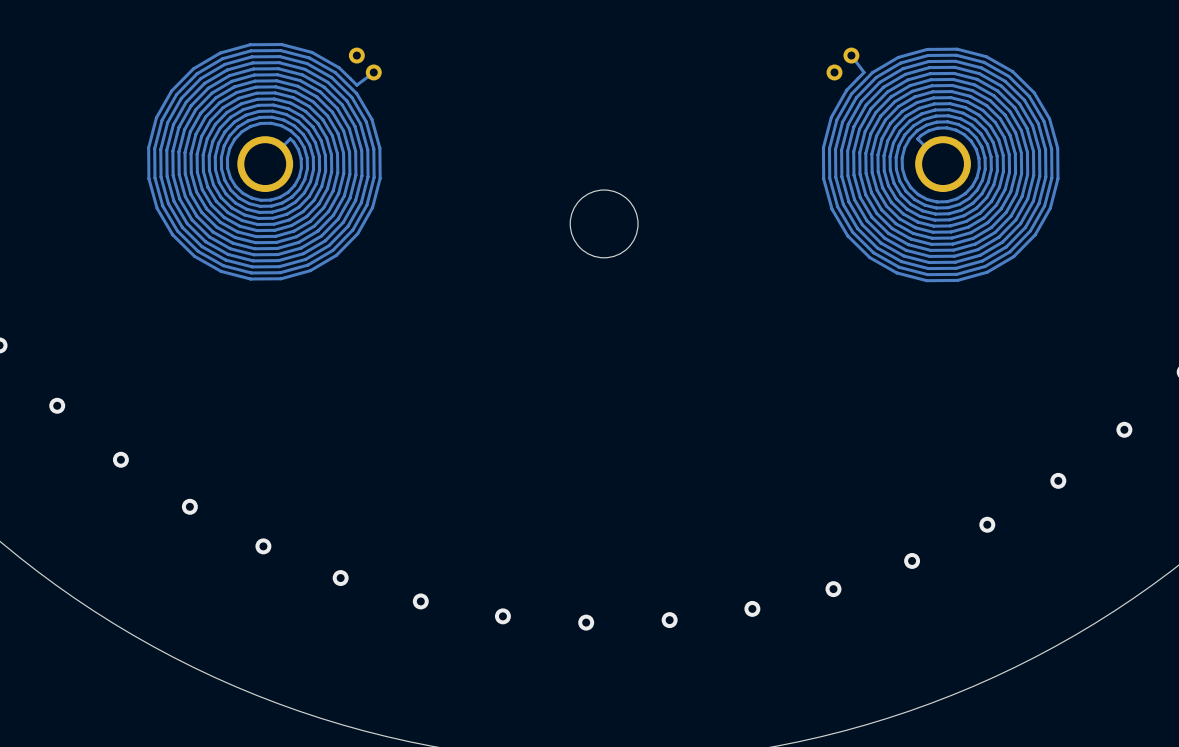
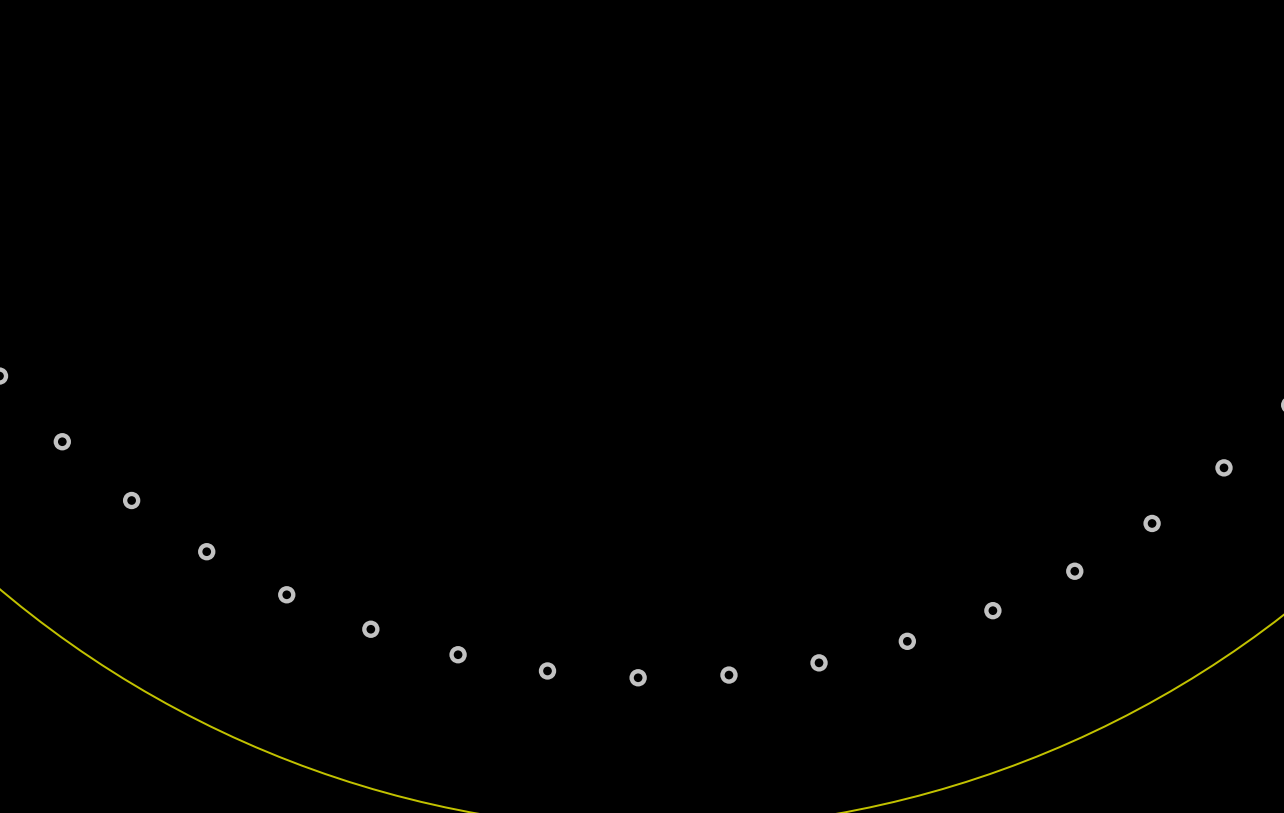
part: (264, 161) -> none
part: (940, 164) -> none
round board edge: [569, 189, 639, 259] -> none

